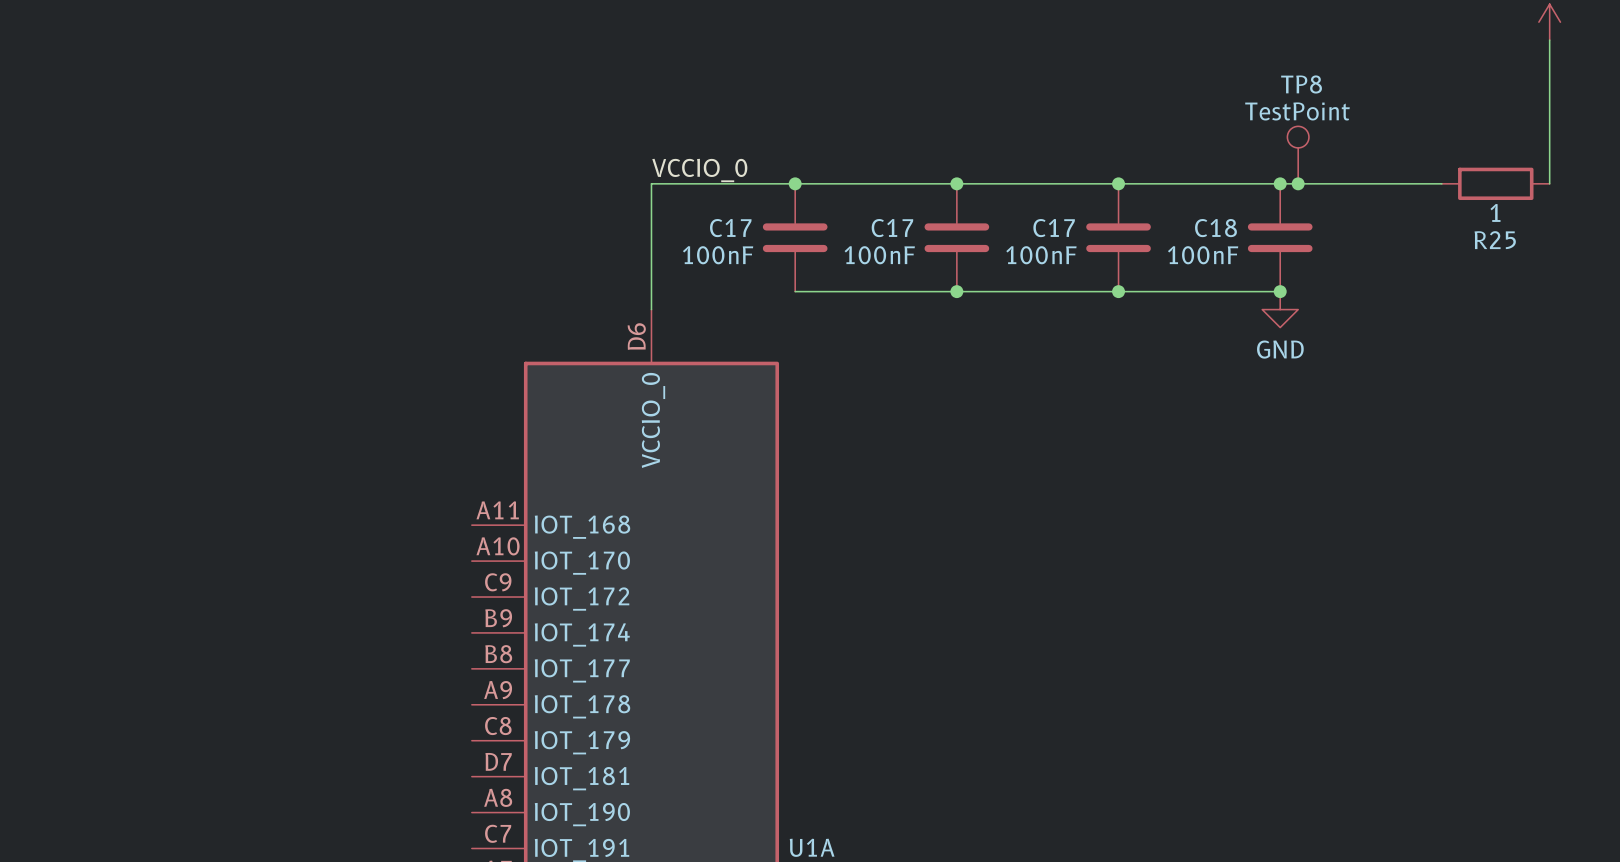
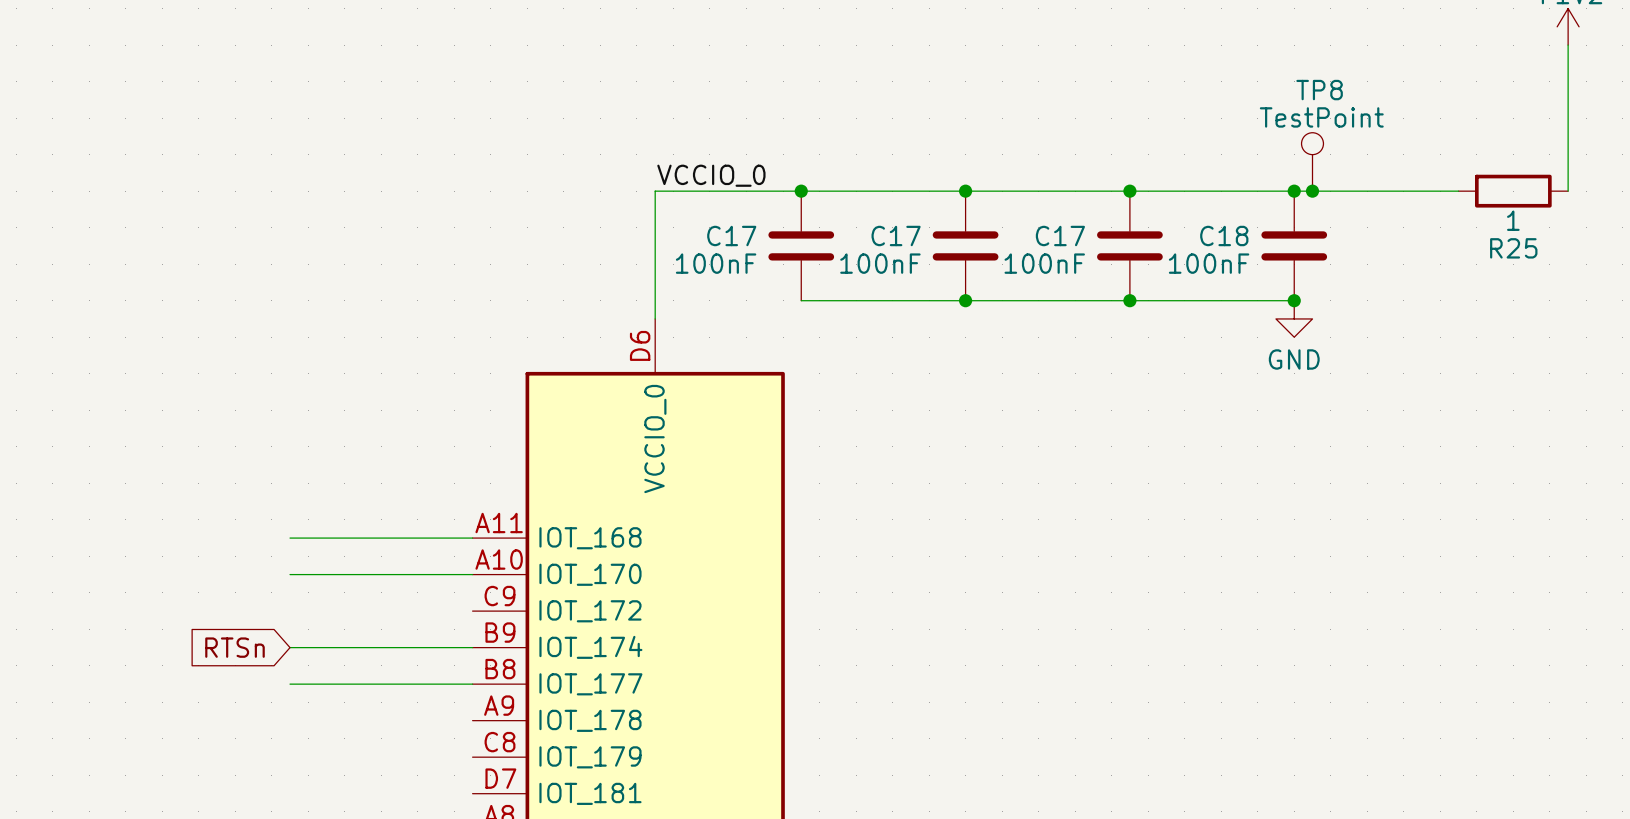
wire: none -> (290, 538) (472, 538)
wire: none -> (290, 574) (472, 574)
wire: none -> (290, 647) (472, 647)
global label: none -> RTSn (235, 647)
wire: none -> (290, 684) (472, 684)

